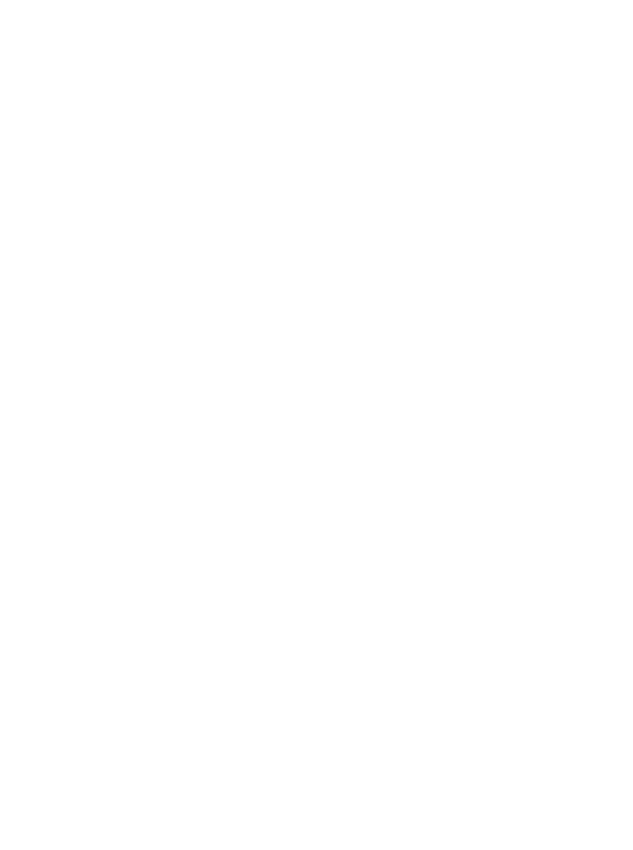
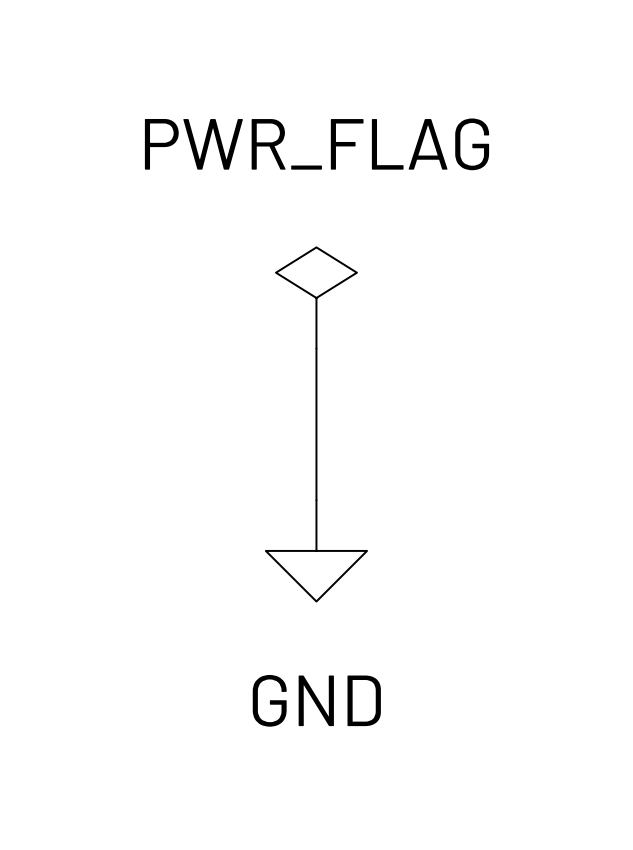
power symbol: none -> PWR_FLAG (316, 298)
wire: none -> (316, 348) (316, 500)
power symbol: none -> GND (316, 550)

